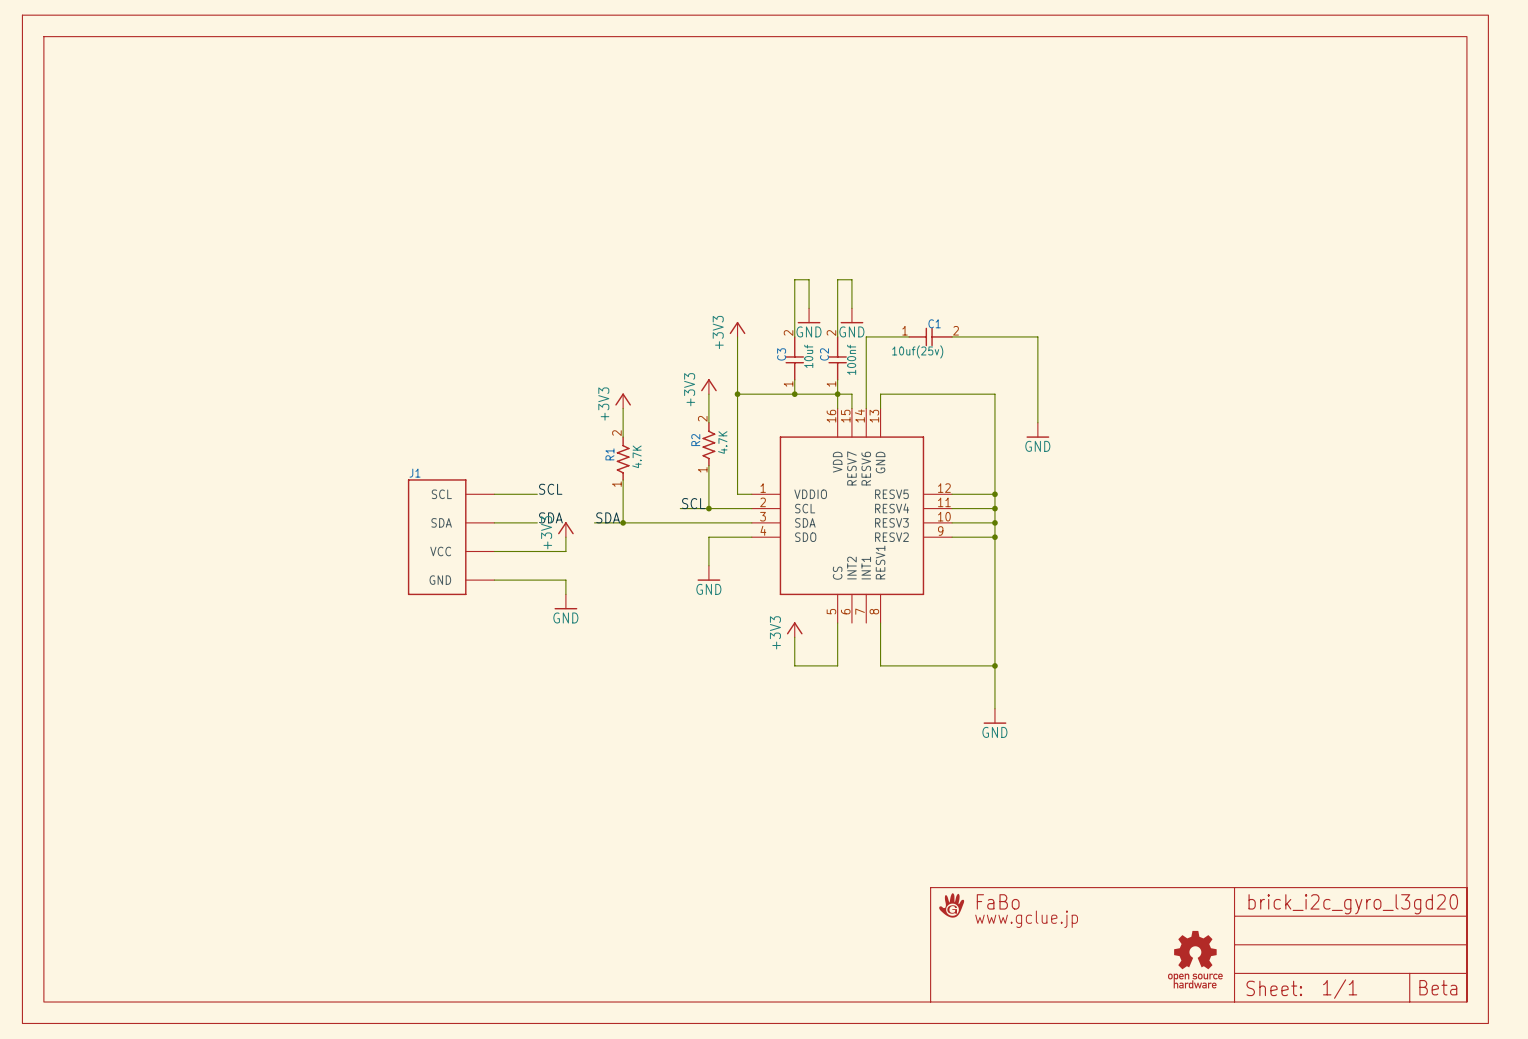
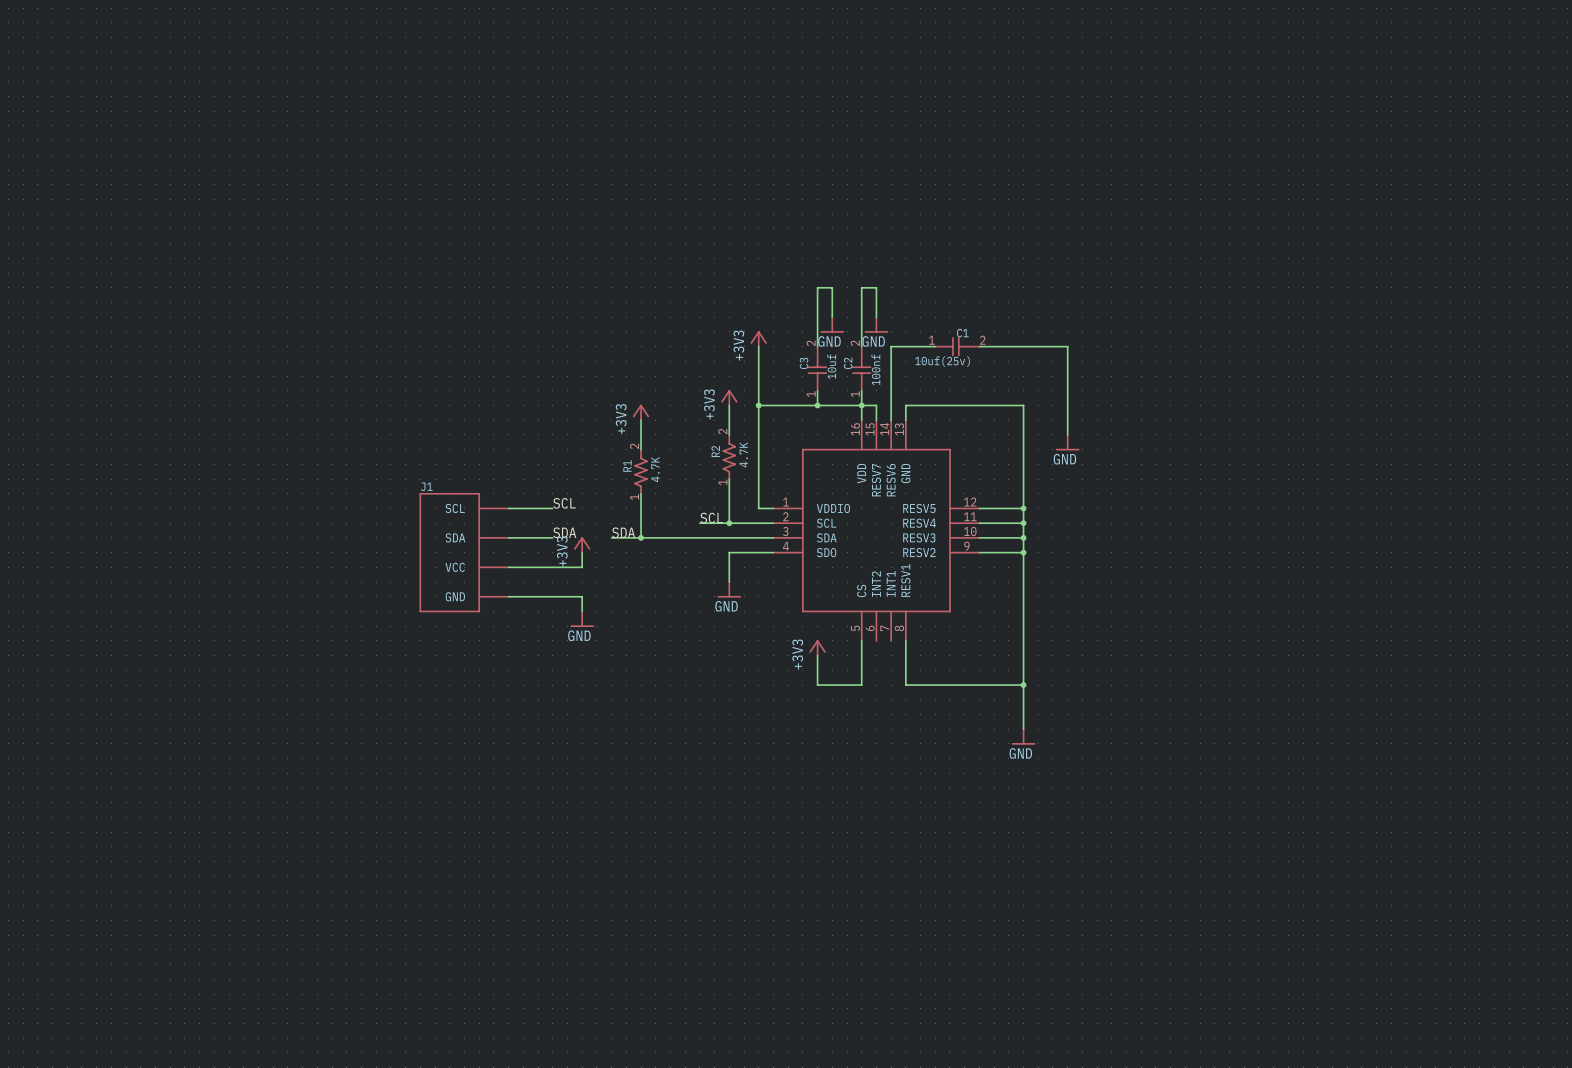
part: (755, 519) -> none
part: (1195, 959) -> none
text: Beta (1438, 987) -> none

